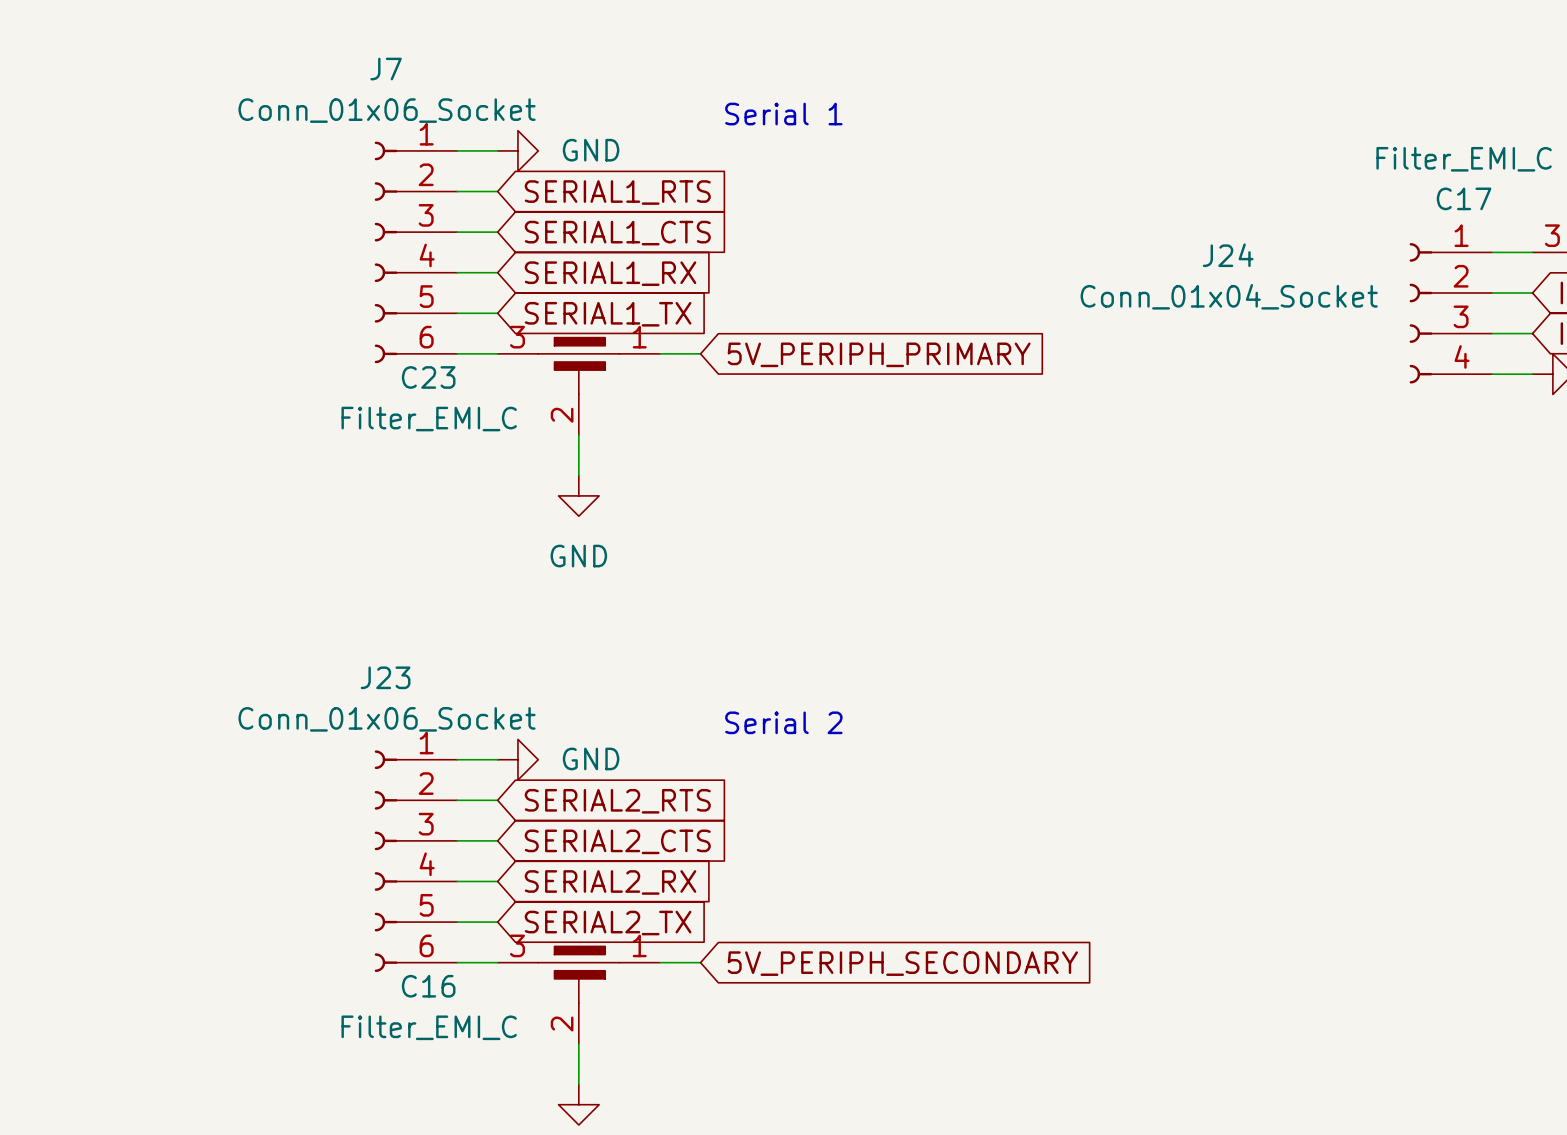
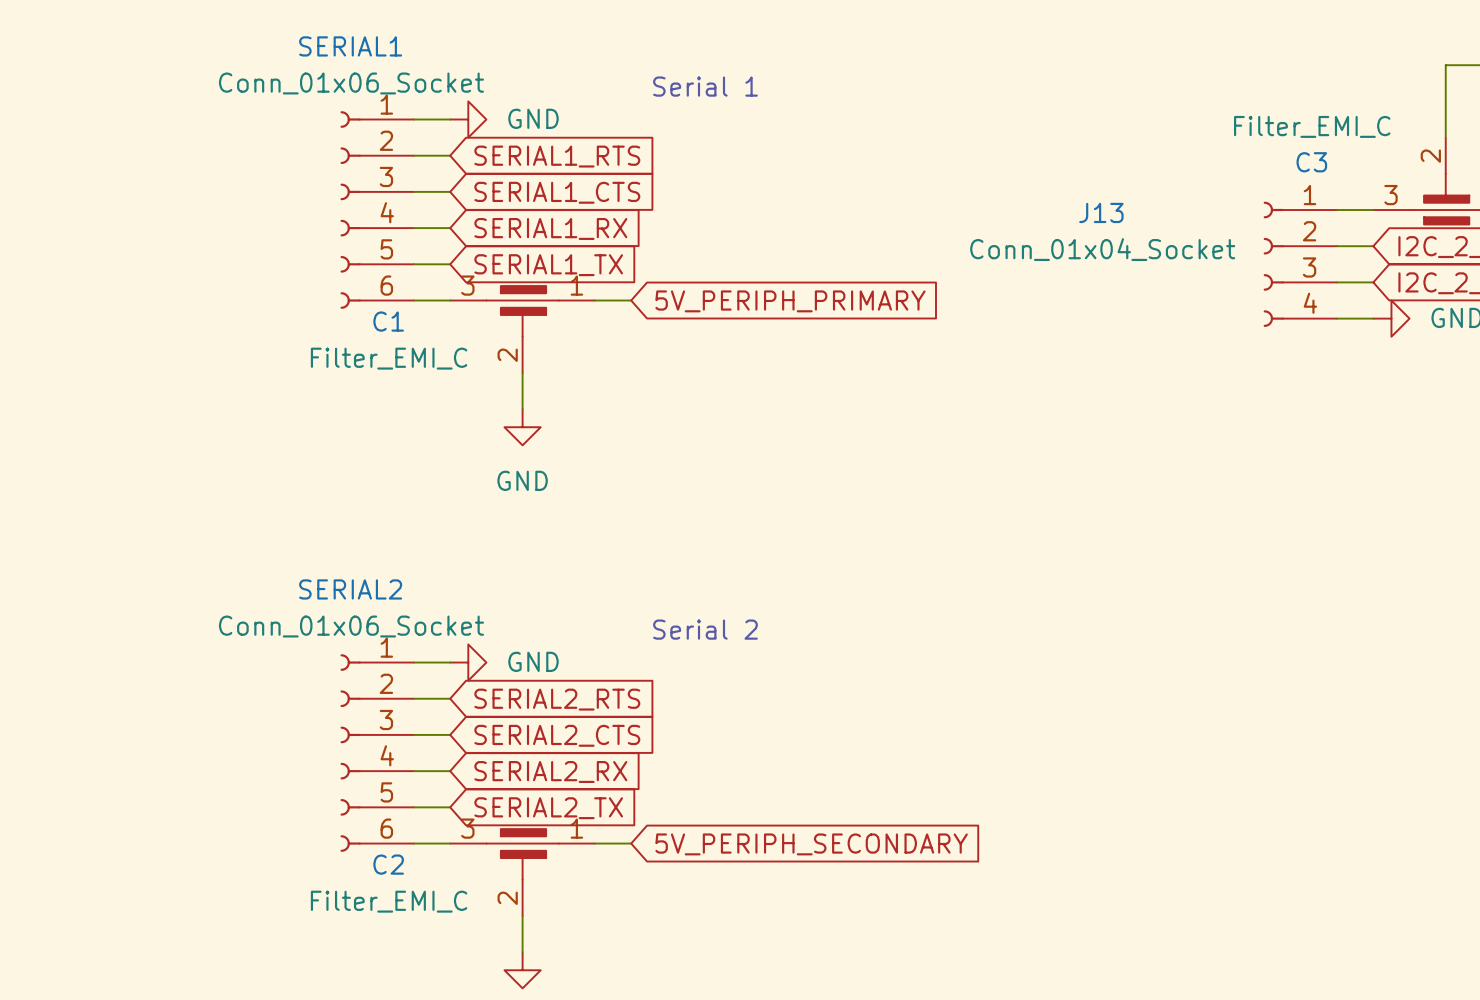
J7 name: J7 (386, 69) -> SERIAL1 (350, 46)
C17 name: C17 (1464, 198) -> C3 (1311, 162)
J24 name: J24 (1228, 255) -> J13 (1101, 212)
C23 name: C23 (428, 377) -> C1 (388, 321)
J23 name: J23 (385, 677) -> SERIAL2 (350, 589)
C16 name: C16 (428, 986) -> C2 (388, 864)

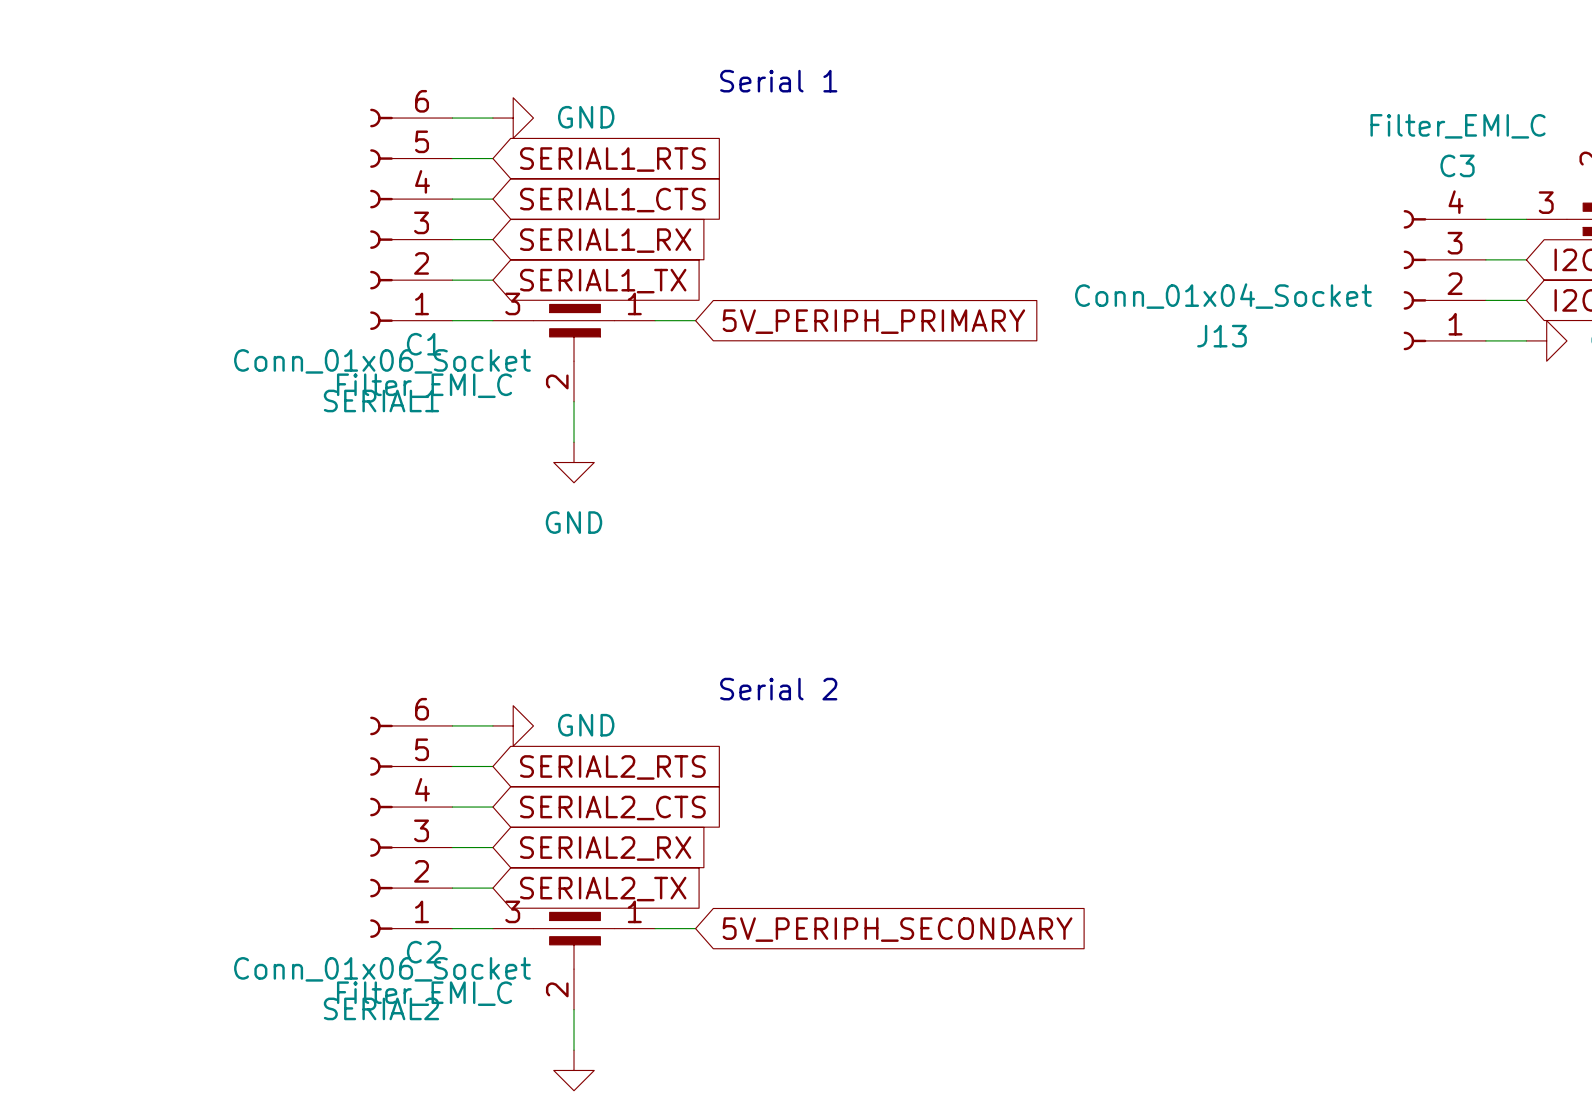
SERIAL1 flip: as is (350, 210) -> up-down (381, 219)
J13 flip: as is (1273, 264) -> up-down (1414, 280)
SERIAL2 flip: as is (350, 753) -> up-down (381, 827)

